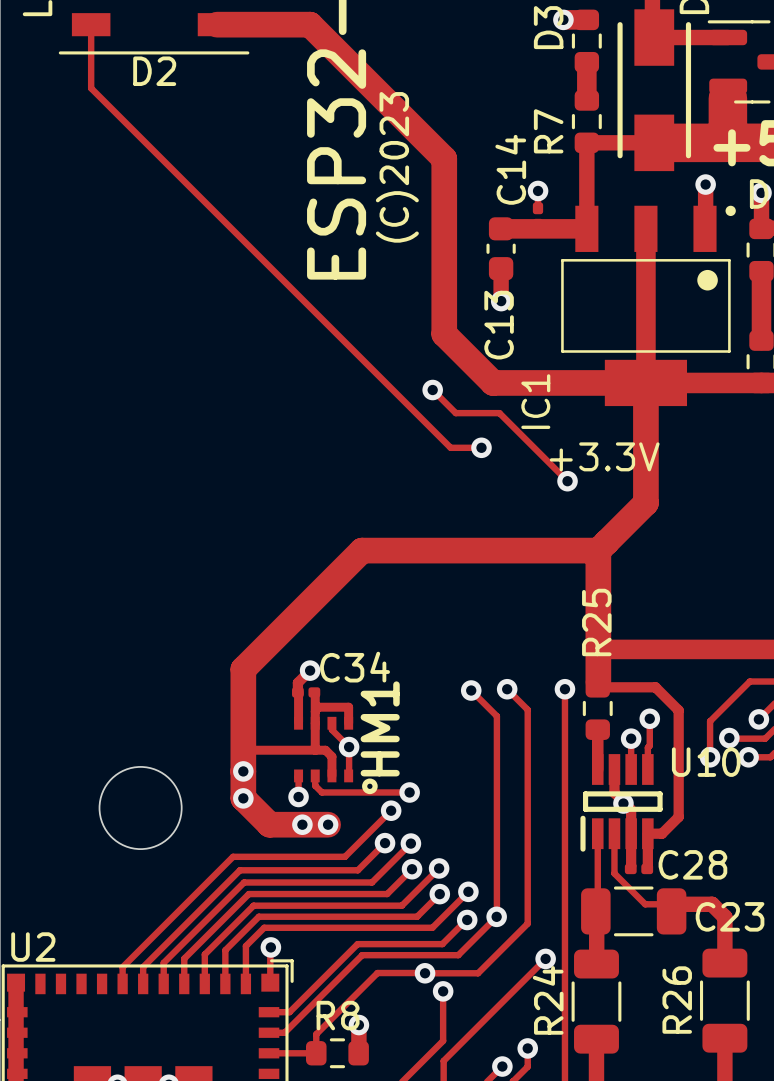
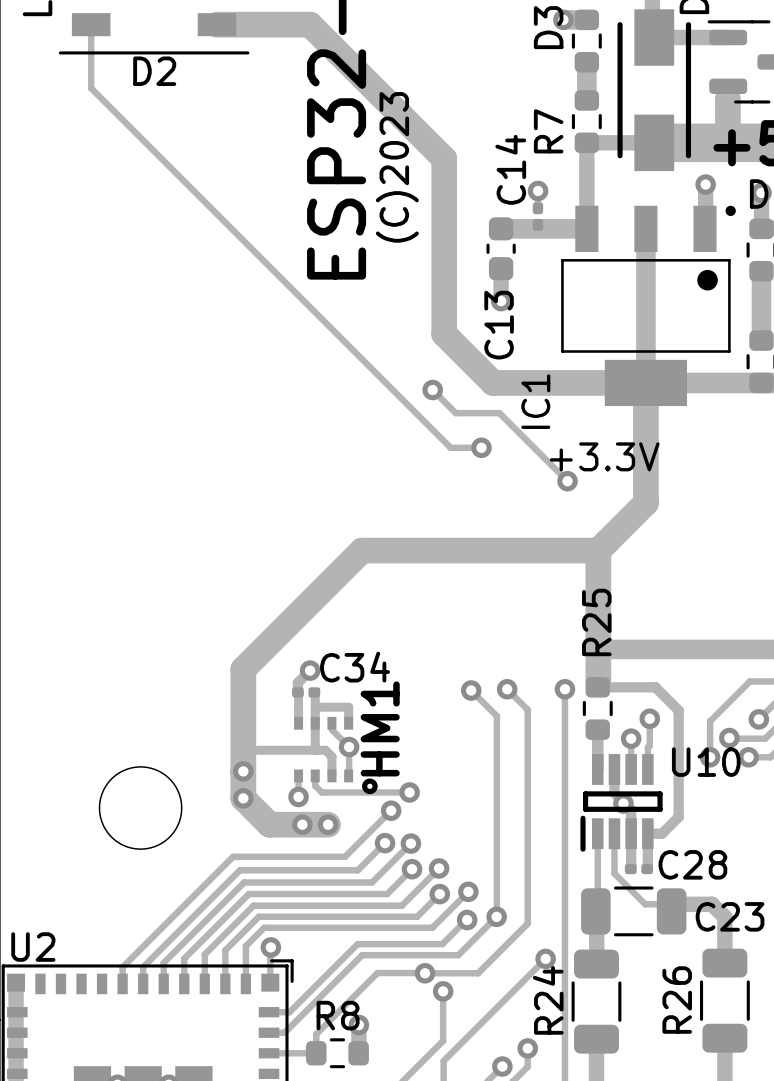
track width: thick (727, 98) (727, 134) -> thin (727, 98) (727, 134)

